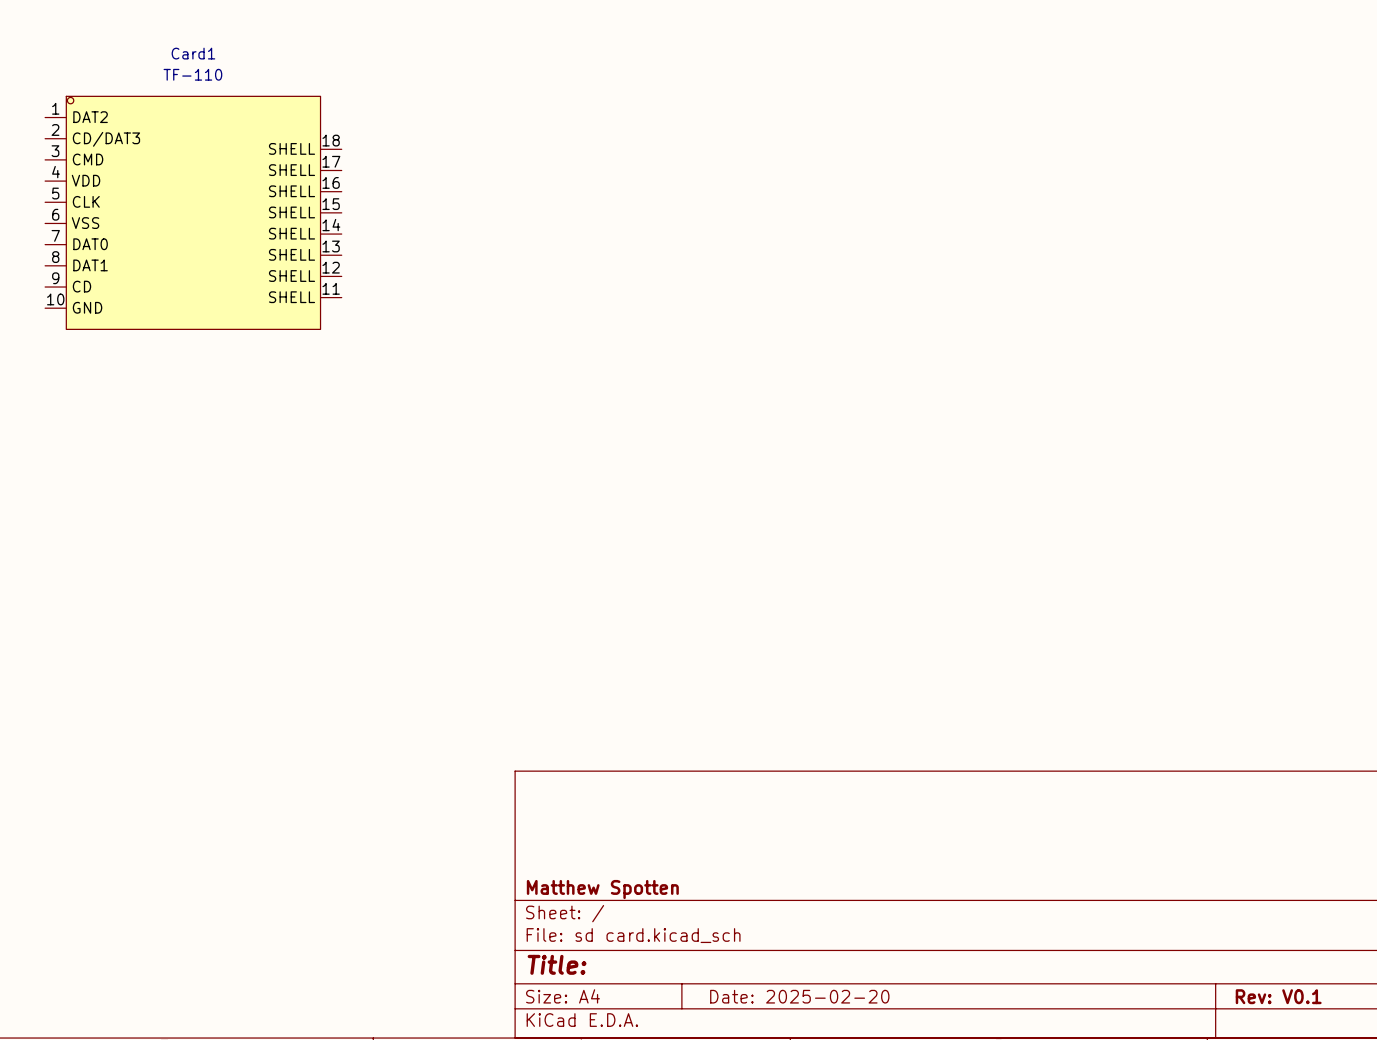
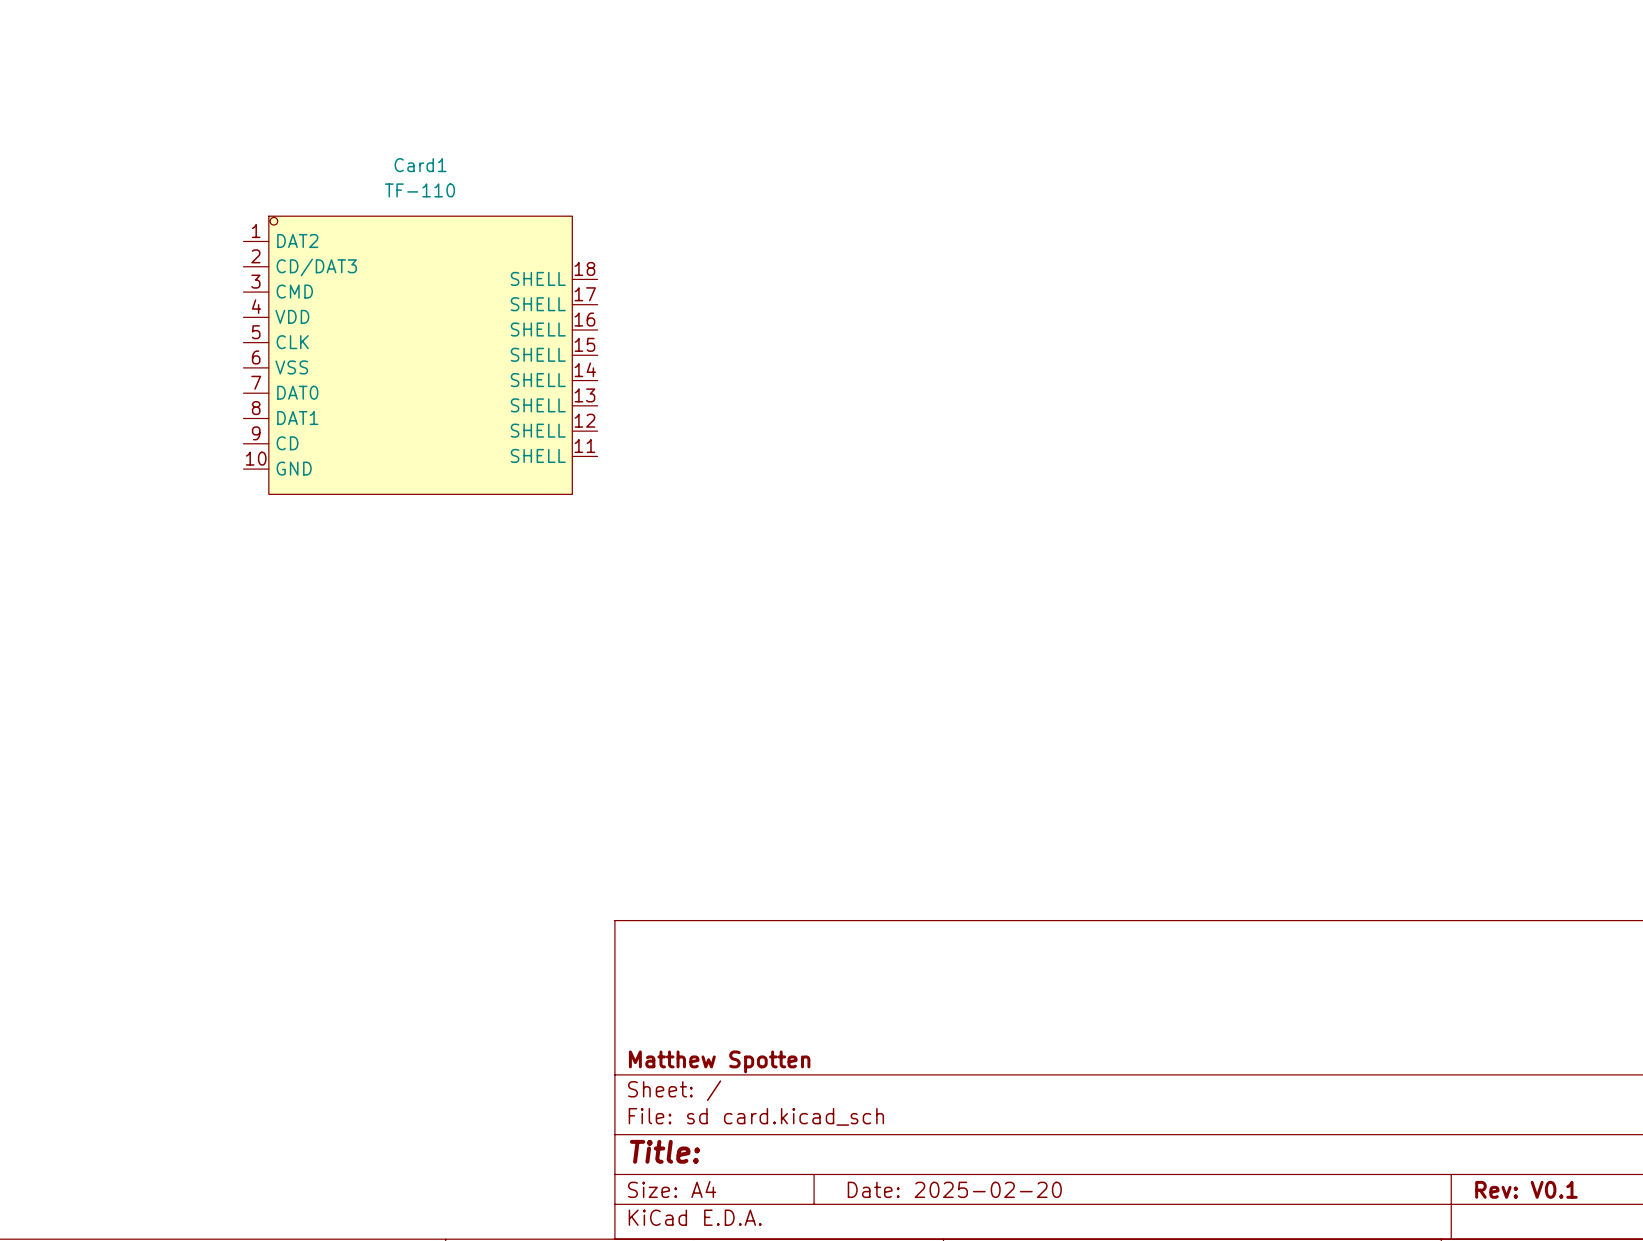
Card1 position: (193, 212) -> (420, 355)

